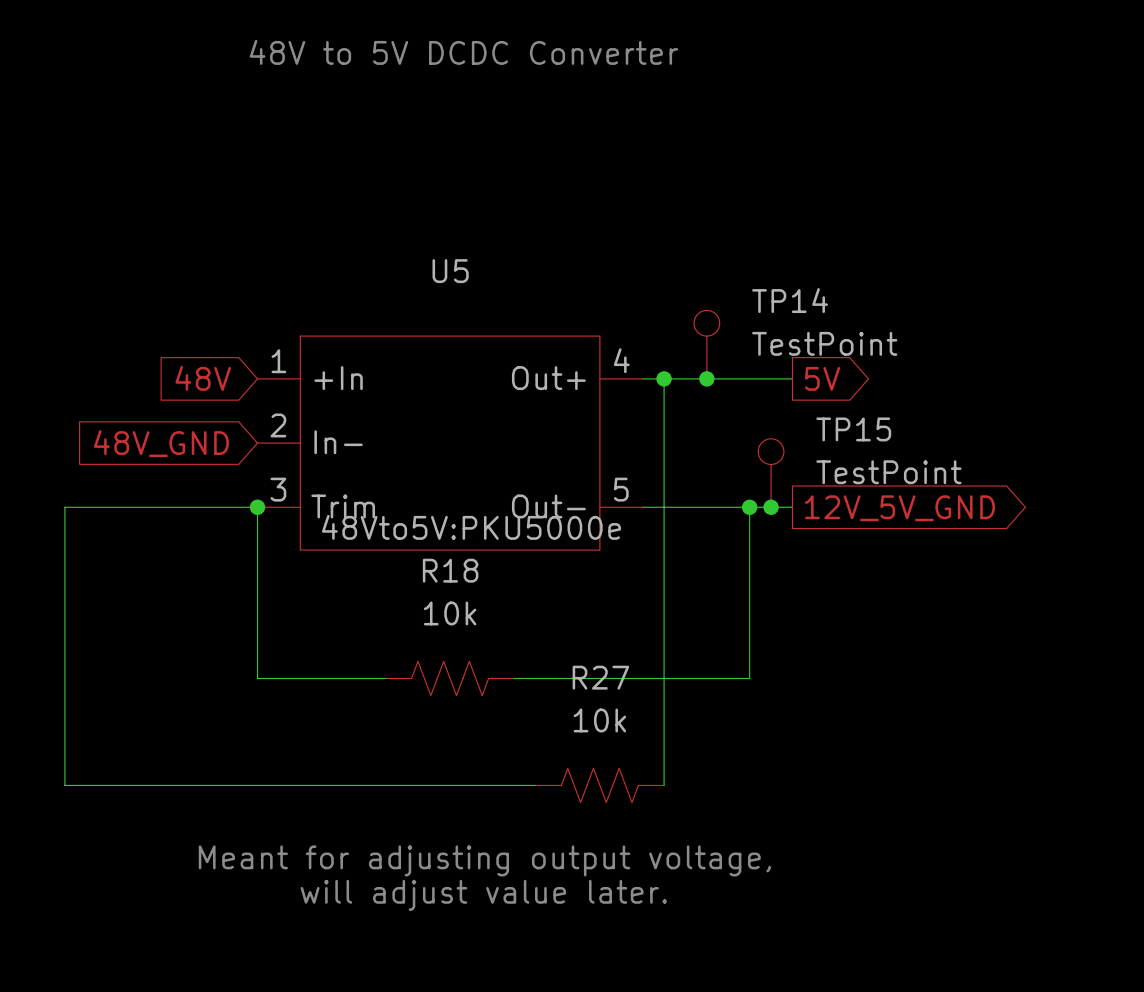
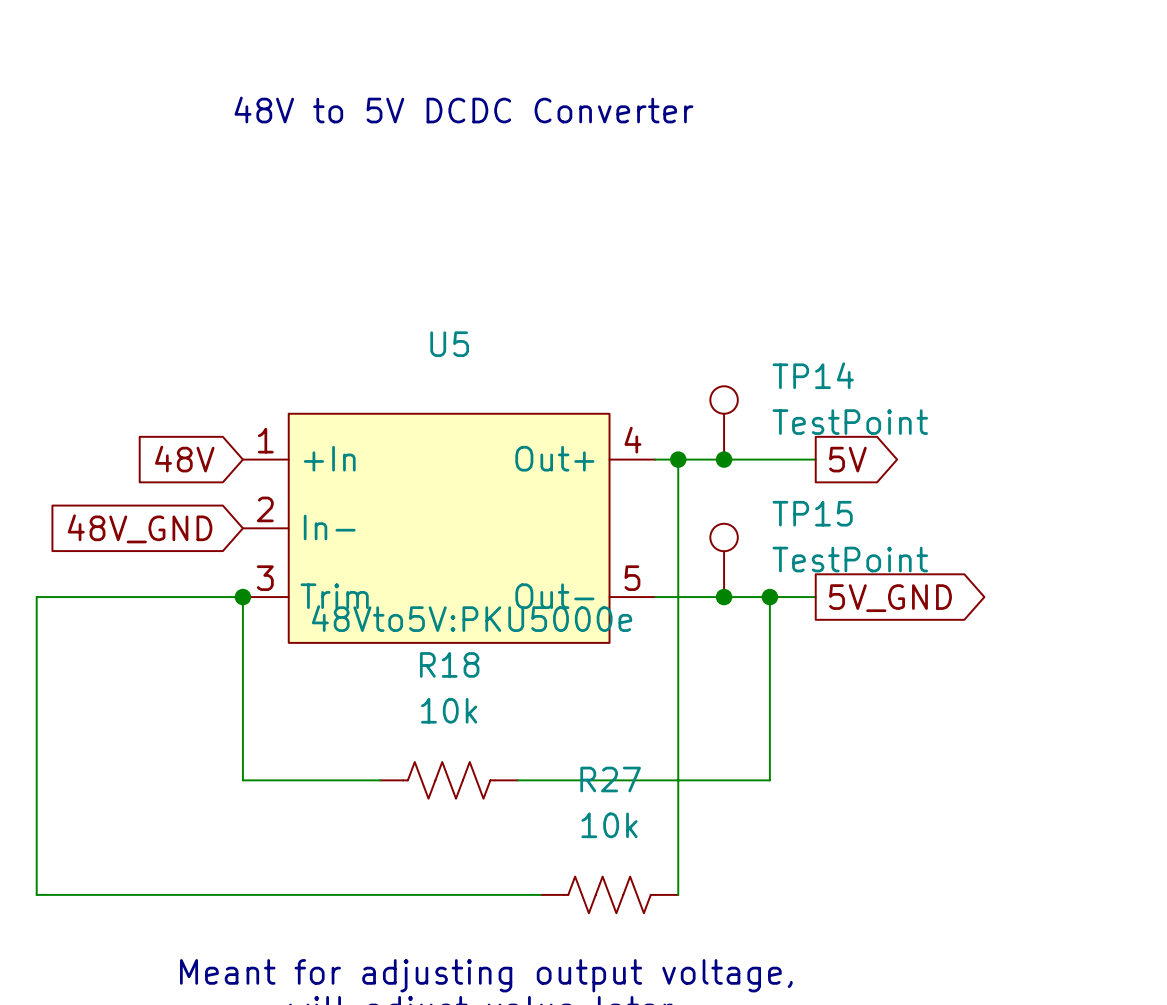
TP15 position: (771, 473) -> (724, 560)
junction position: (771, 507) -> (724, 597)
global label: 12V_5V_GND (899, 508) -> 5V_GND (890, 598)

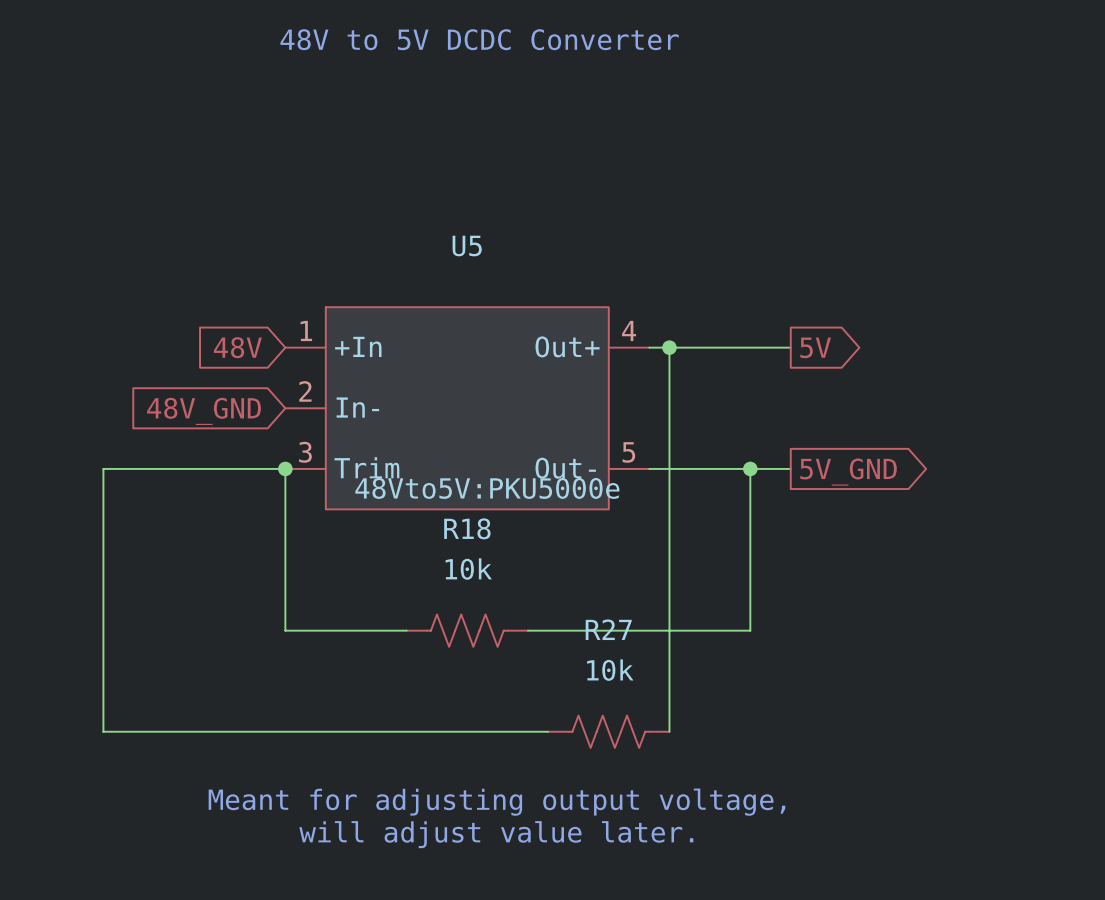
TP14: TestPoint (724, 422) -> none
junction: (724, 459) -> none
TP15: TestPoint (724, 560) -> none
junction: (724, 597) -> none

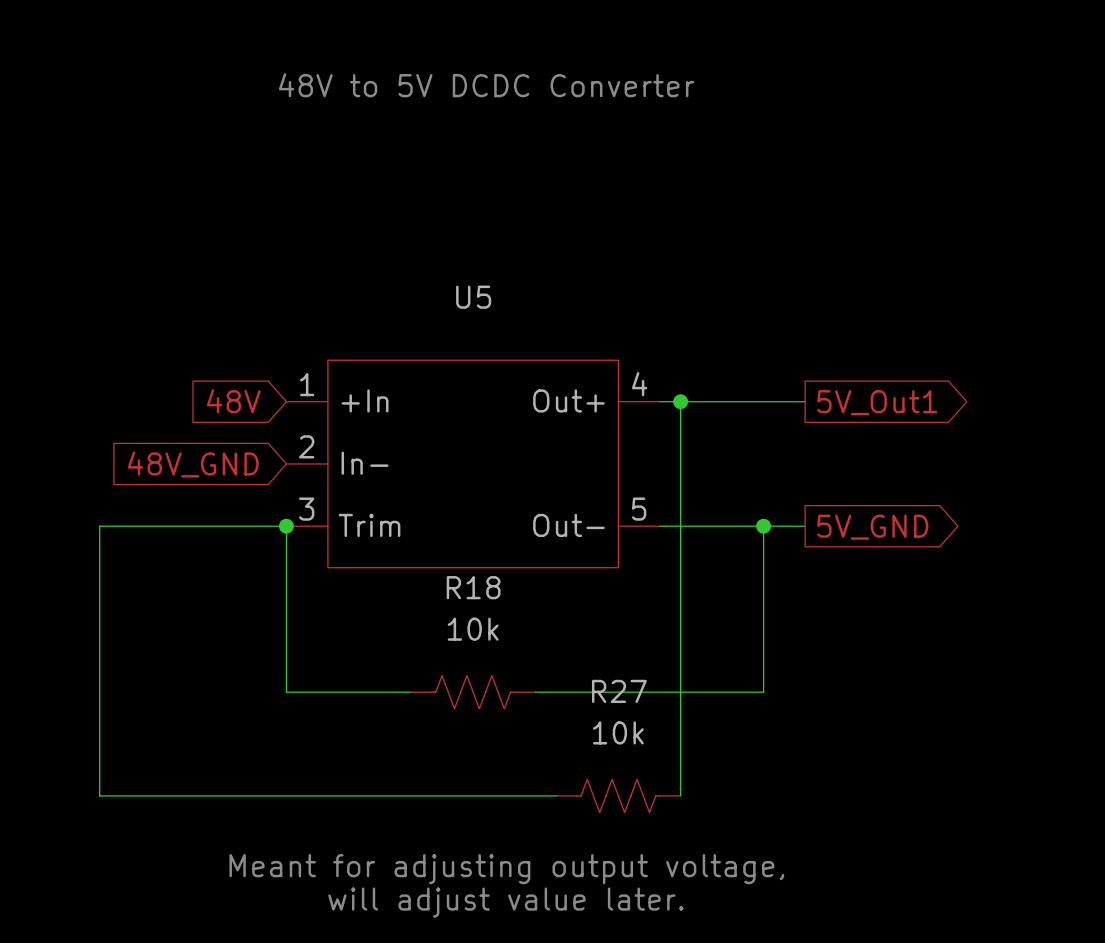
global label: 5V (815, 347) -> 5V_Out1 (877, 402)
U5 text: 48Vto5V:PKU5000e (487, 488) -> none

